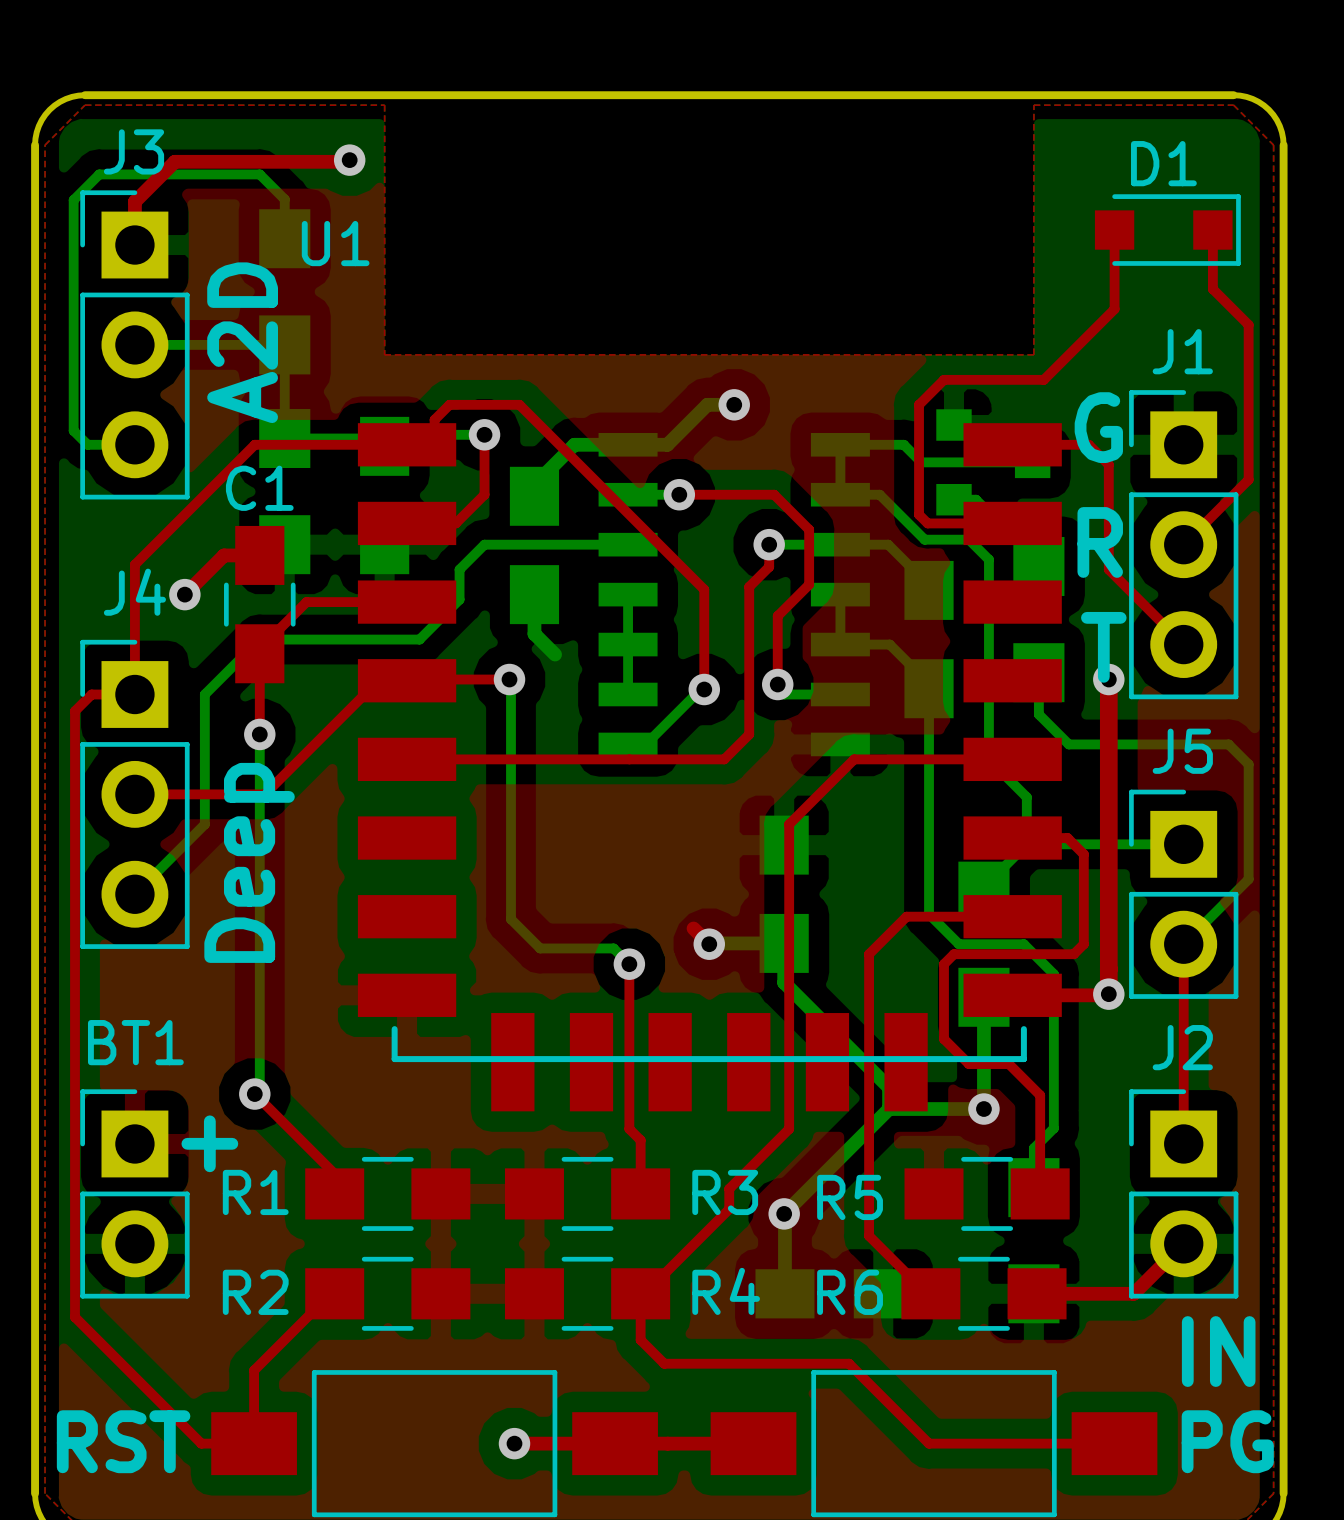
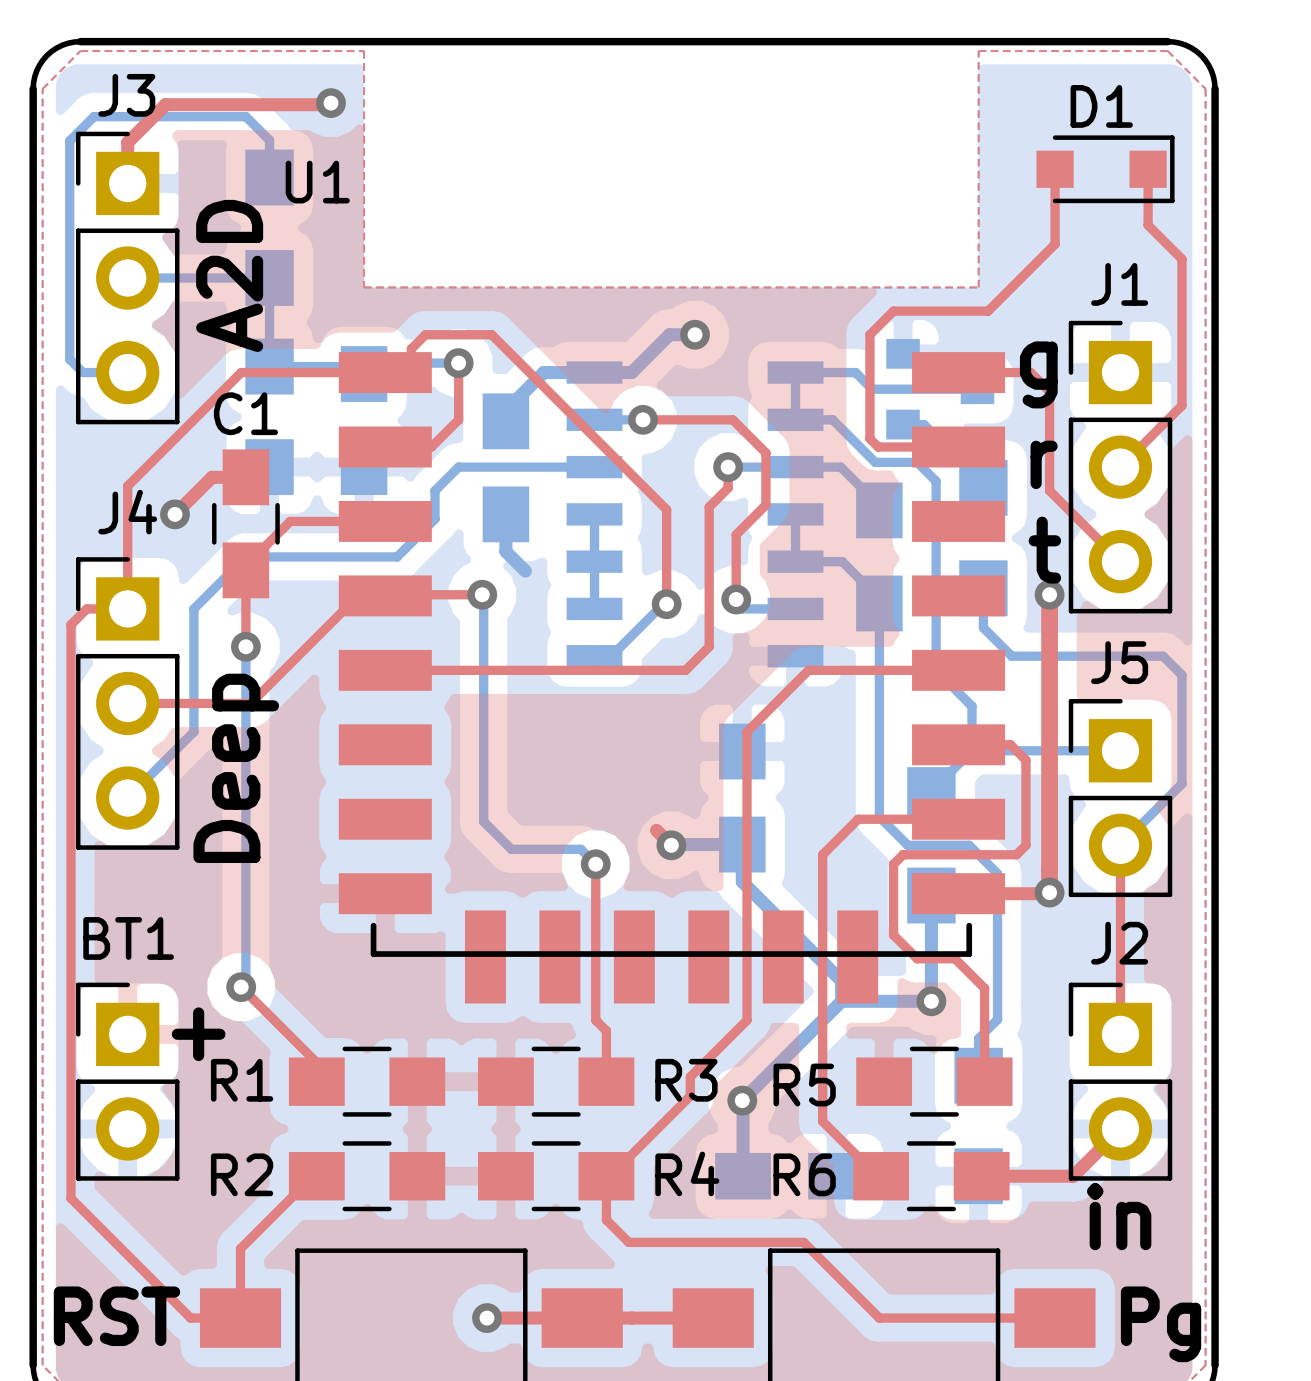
text: G (1098, 427) -> g (1038, 374)
text: R (1100, 542) -> r (1044, 464)
text: T (1103, 647) -> t (1044, 550)
text: IN (1218, 1351) -> in (1119, 1216)
text: PG (1227, 1441) -> Pg (1161, 1324)

